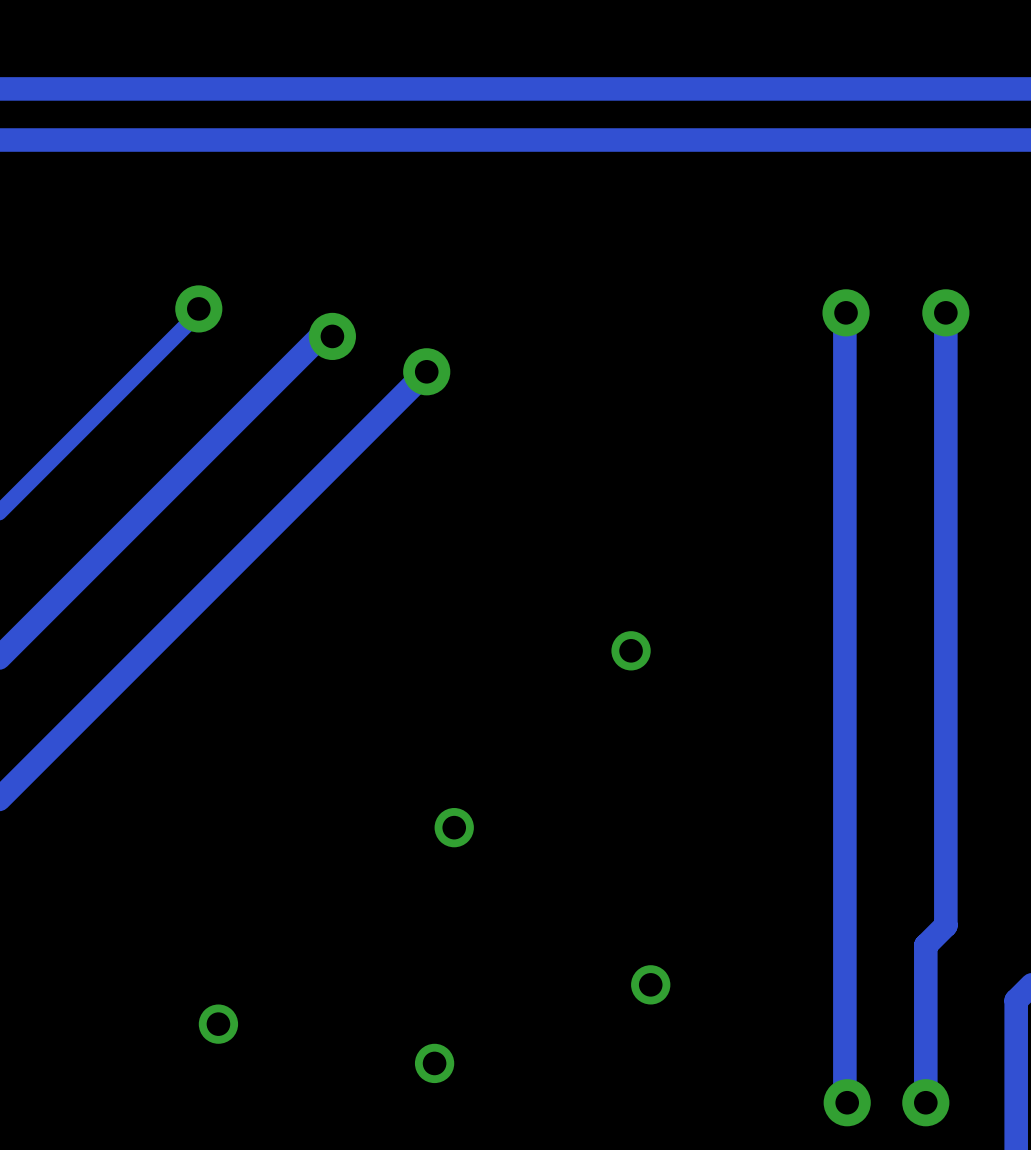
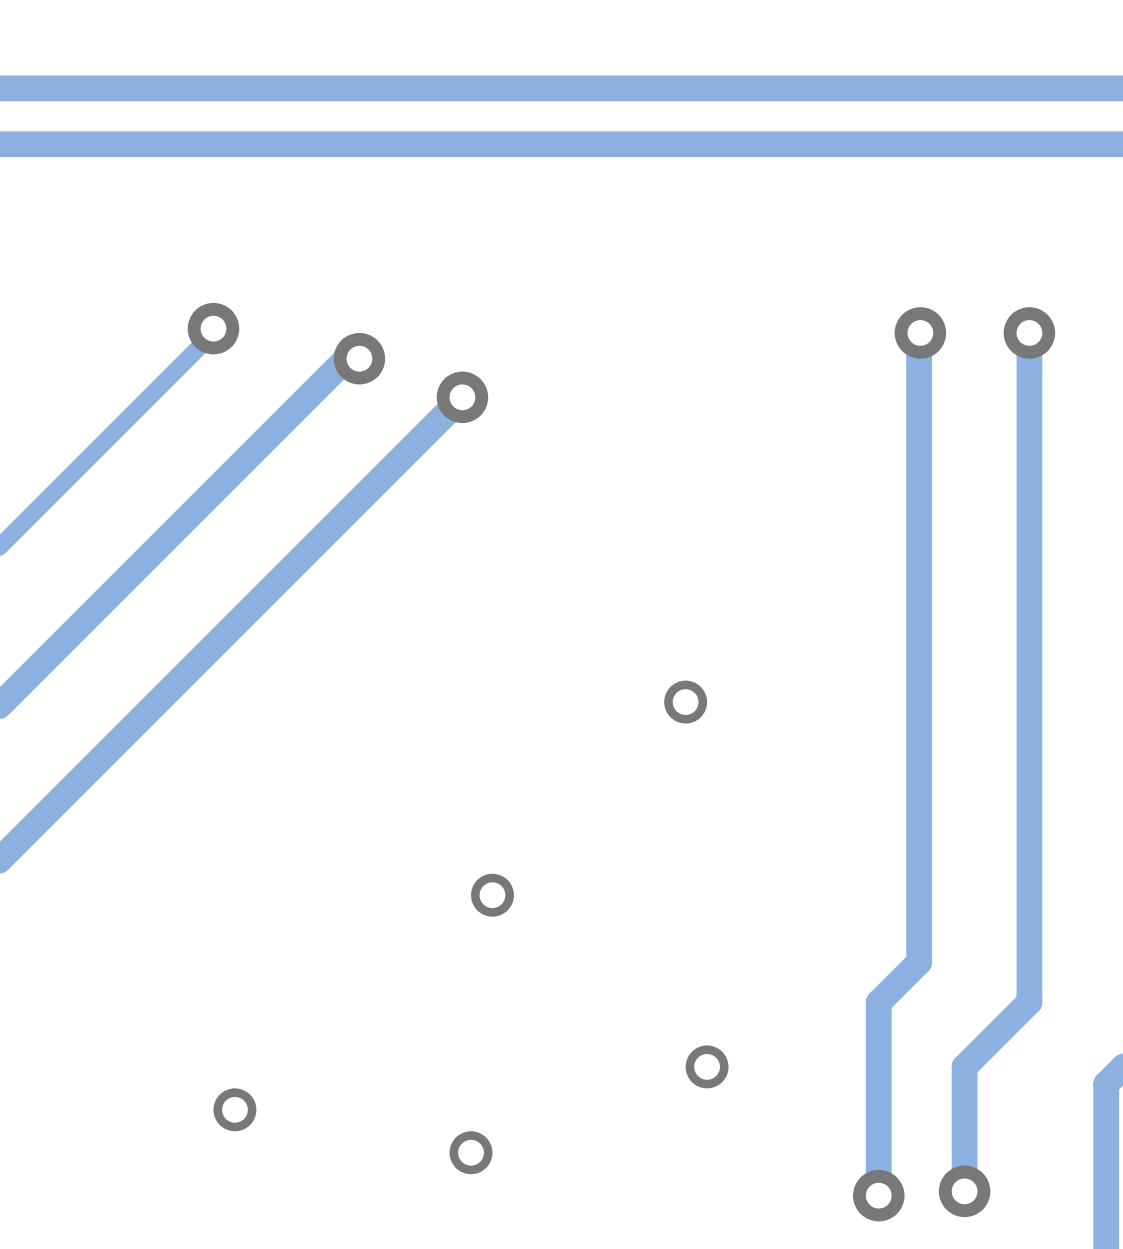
track: (844, 888) (844, 1100) (847, 1102) -> (919, 962) (878, 1002) (878, 1195)
track: (925, 945) (925, 1102) -> (1007, 1023) (964, 1066) (964, 1191)
via: none -> (964, 1191)
via: none -> (878, 1195)
via: (847, 1102) -> none
via: (925, 1102) -> none

